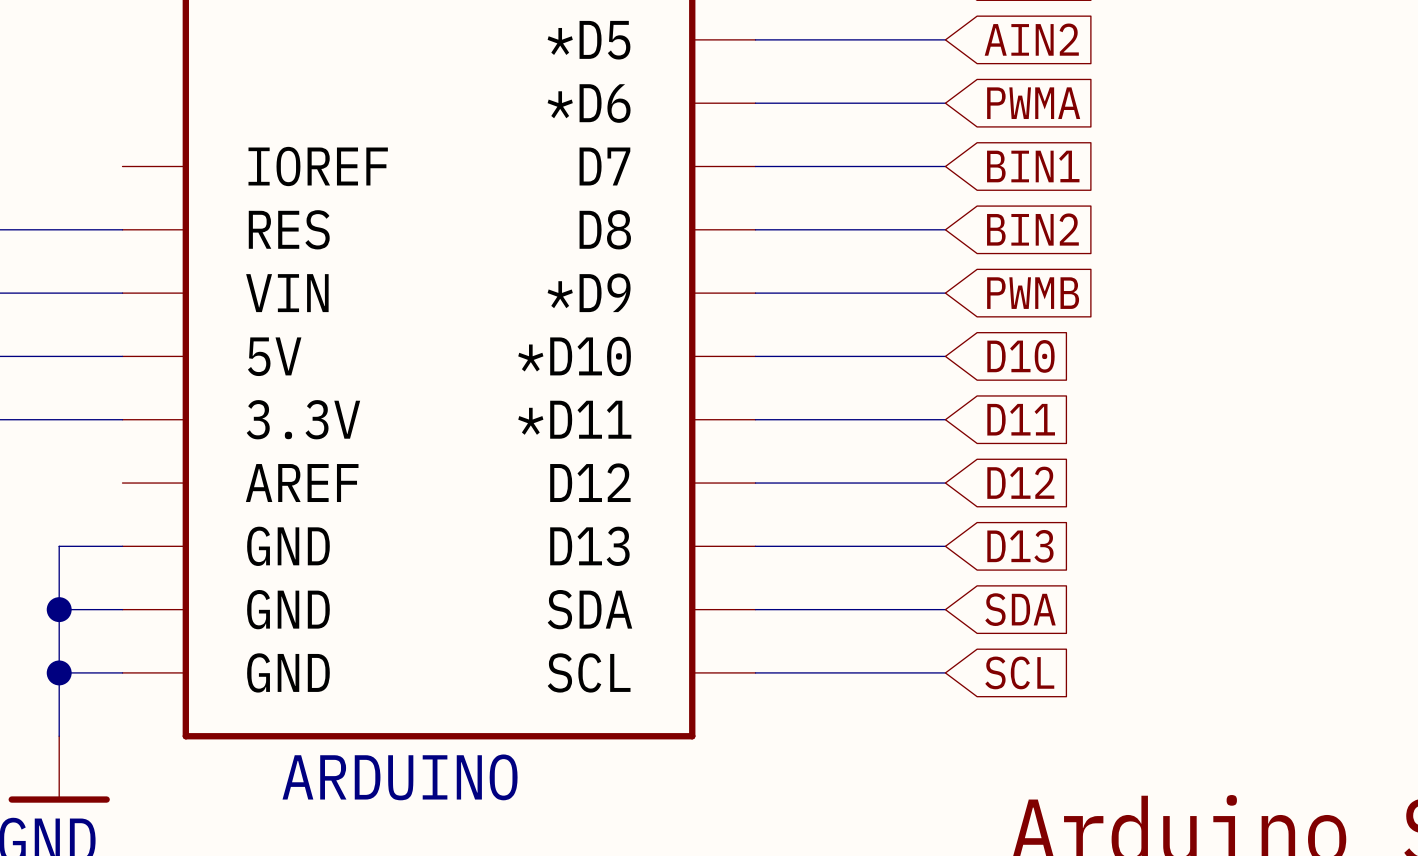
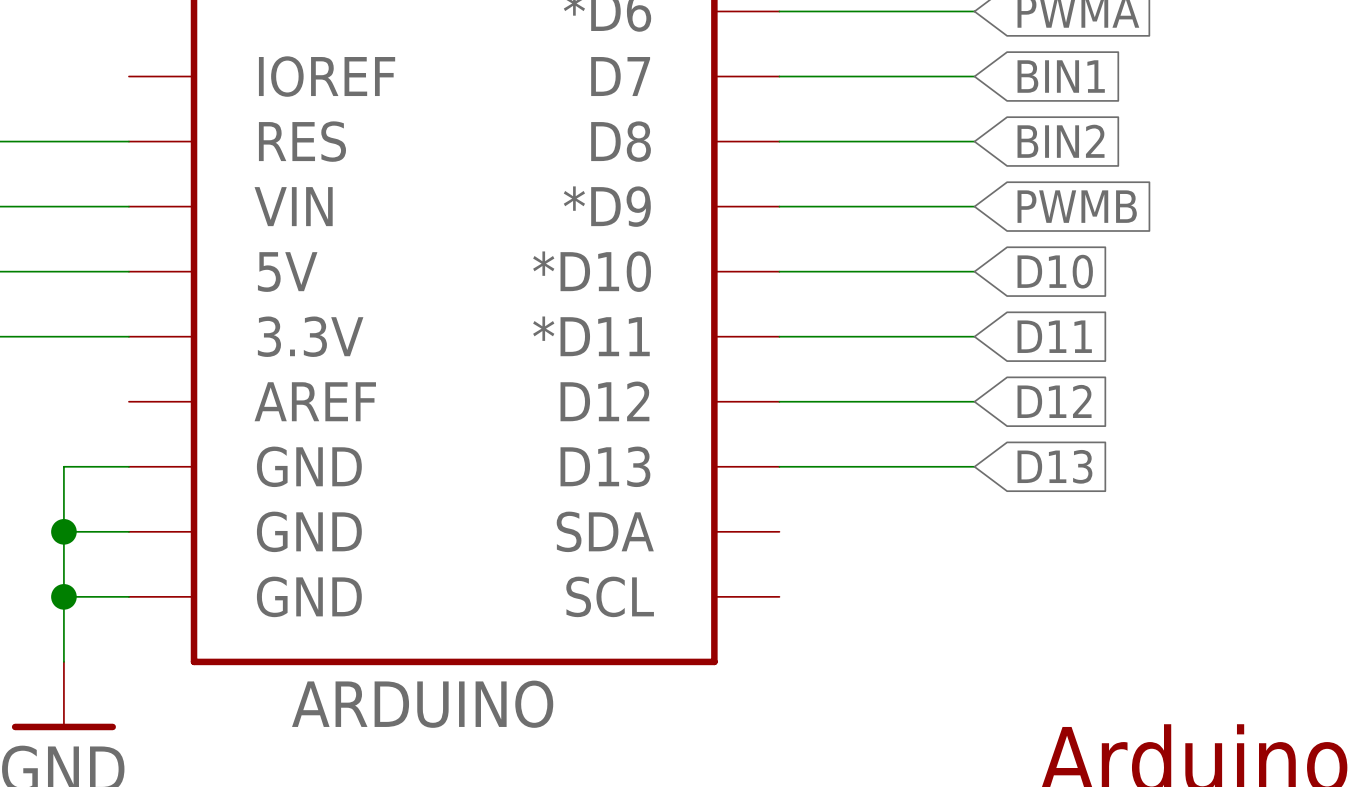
wire: (755, 609) (945, 609) -> none
global label: SDA (1020, 609) -> none
wire: (755, 672) (945, 672) -> none
global label: SCL (1019, 672) -> none

